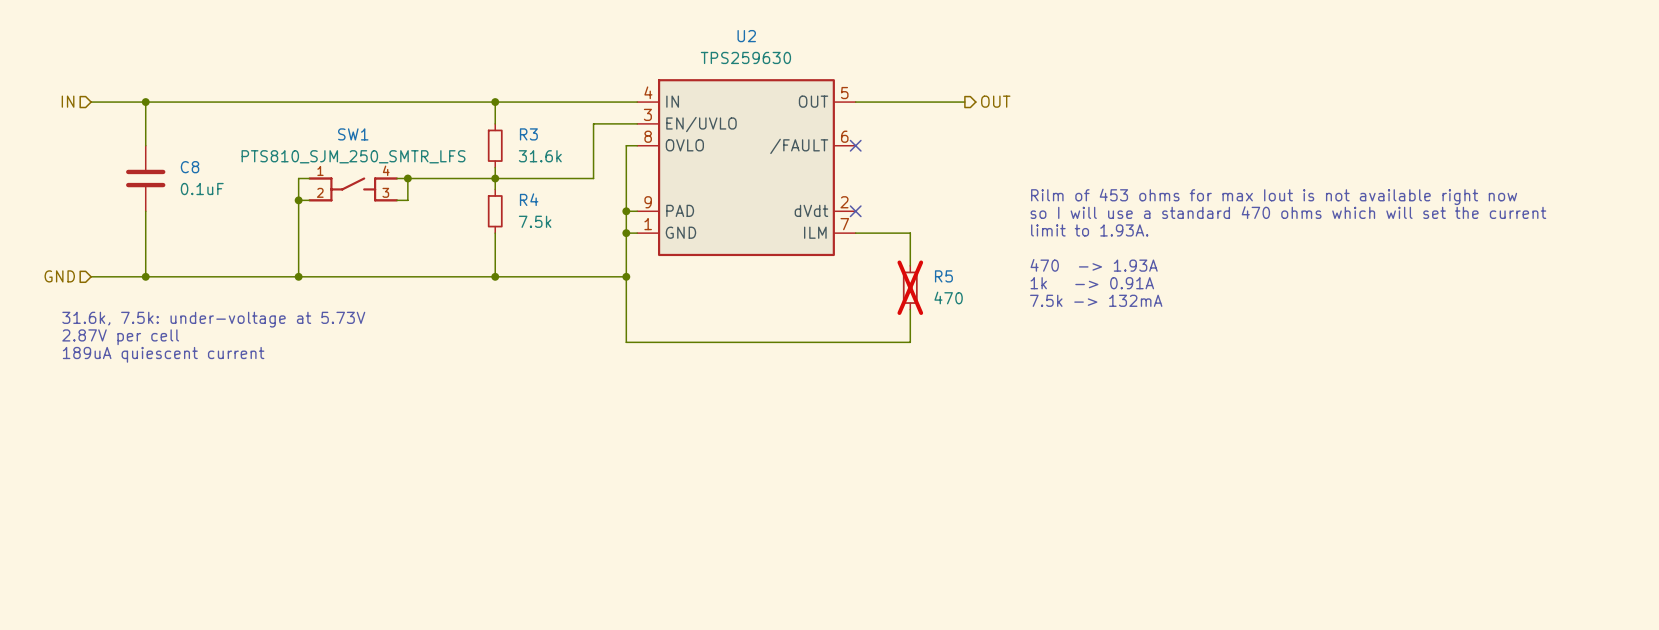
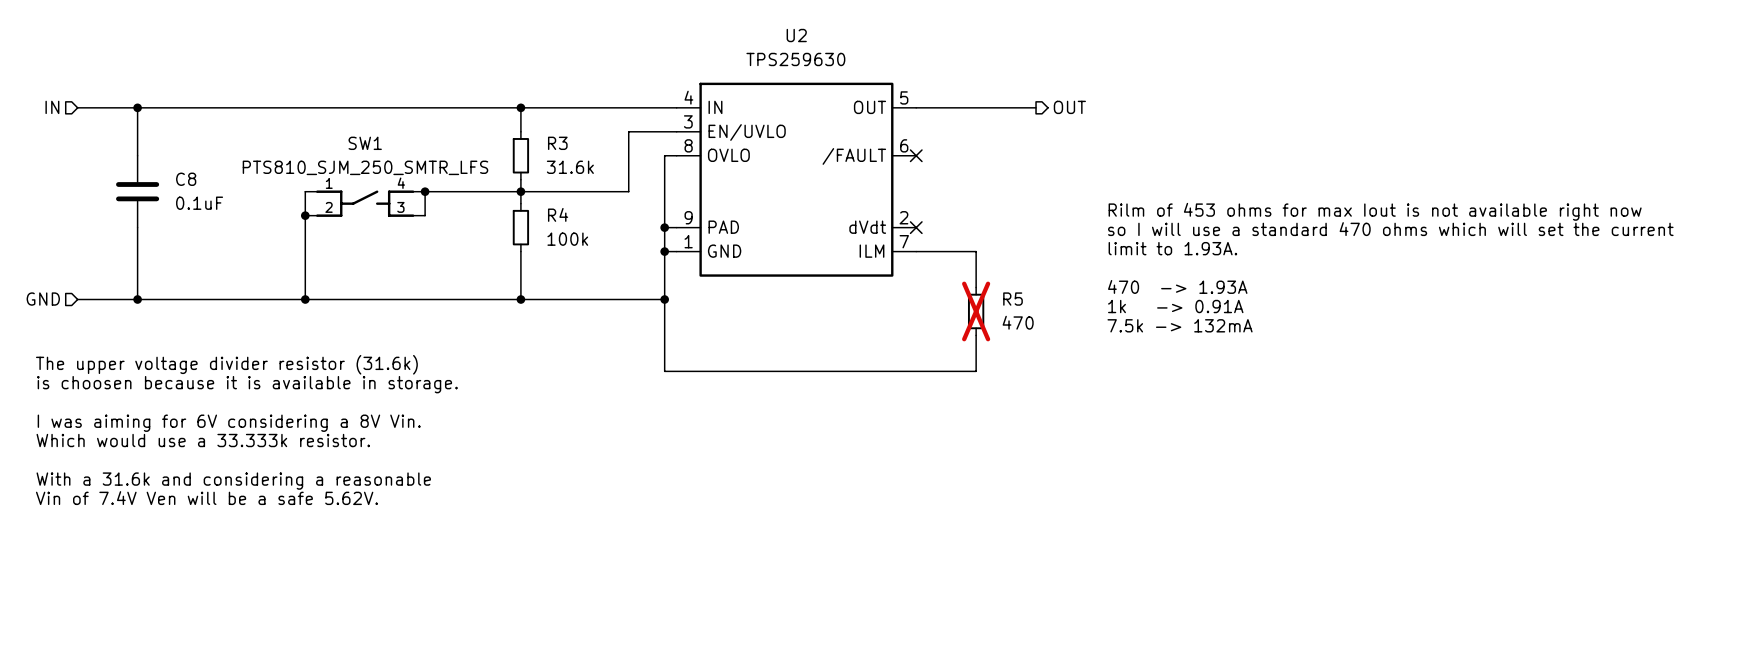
R4 value: 7.5k (535, 221) -> 100k (567, 239)
text: 31.6k, 7.5k: under-voltage at 5.73V (213, 319) -> none
text: none -> The upper voltage divider resistor (31.6k) (226, 364)
text: 2.87V per cell (120, 337) -> none
text: 189uA quiescent current (163, 354) -> none
text: none -> is choosen because it is available in storage. (247, 384)
text: none -> I was aiming for 6V considering a 8V Vin. (229, 423)
text: none -> Which would use a 33.333k resistor. (203, 440)
text: none -> With a 31.6k and considering a reasonable (233, 481)
text: none -> Vin of 7.4V Ven will be a safe 5.62V. (206, 498)

